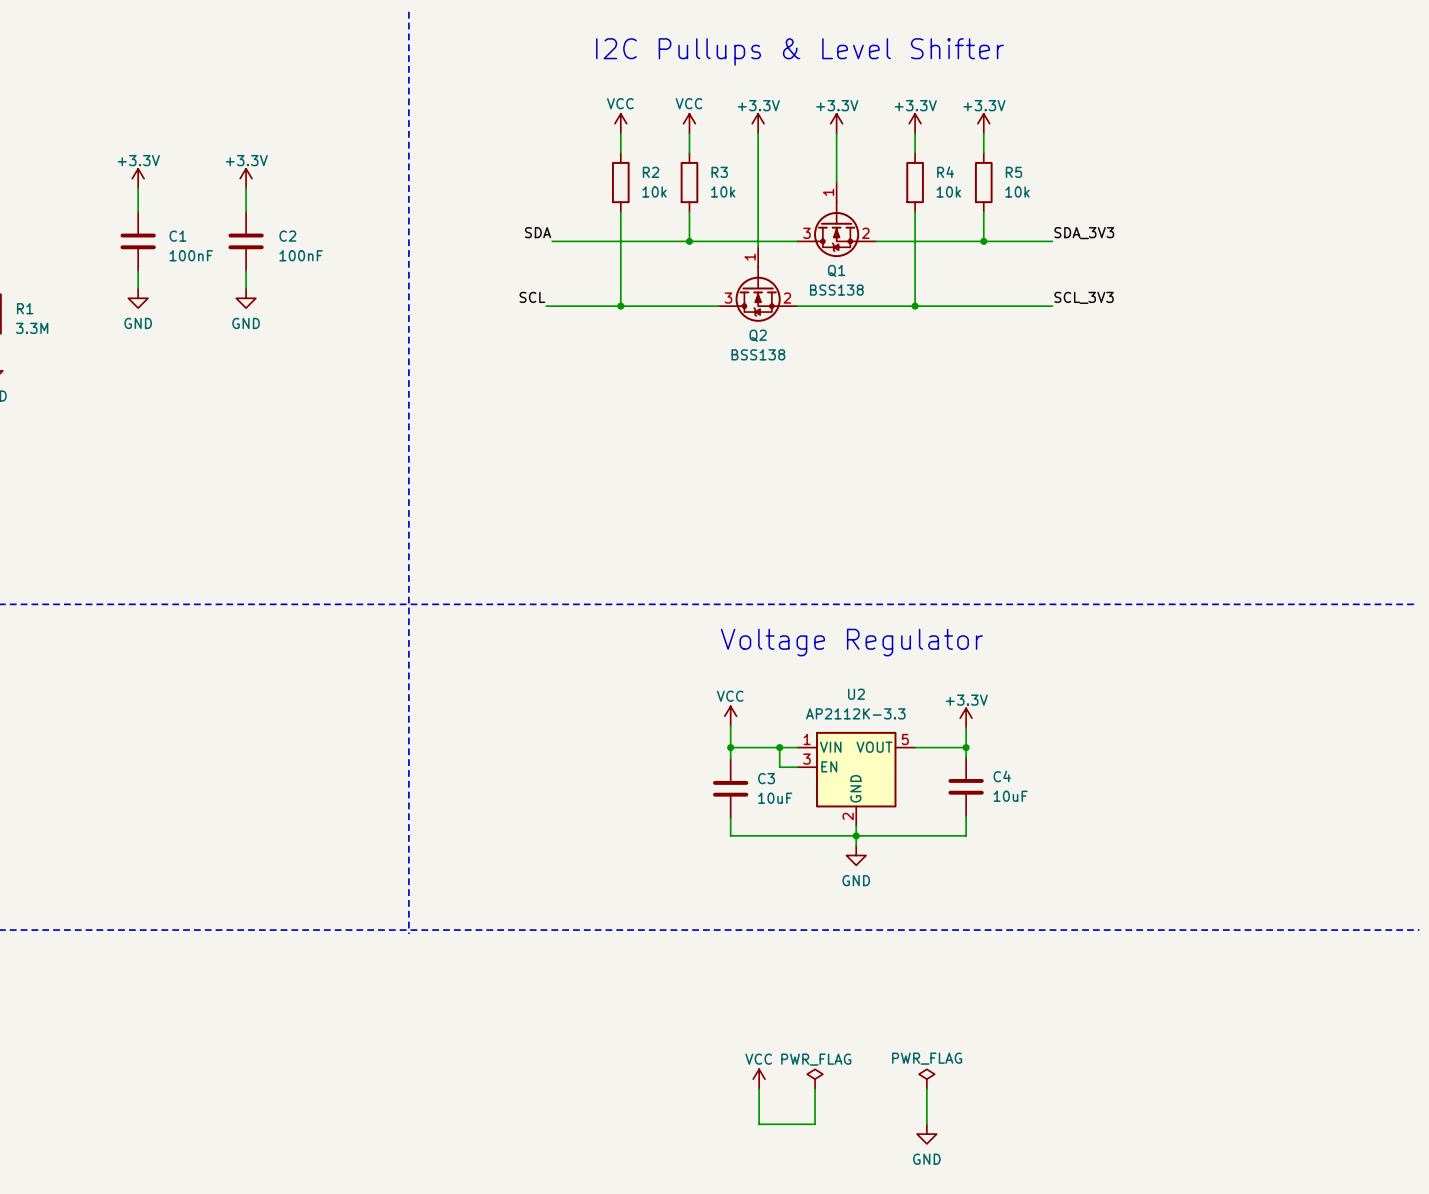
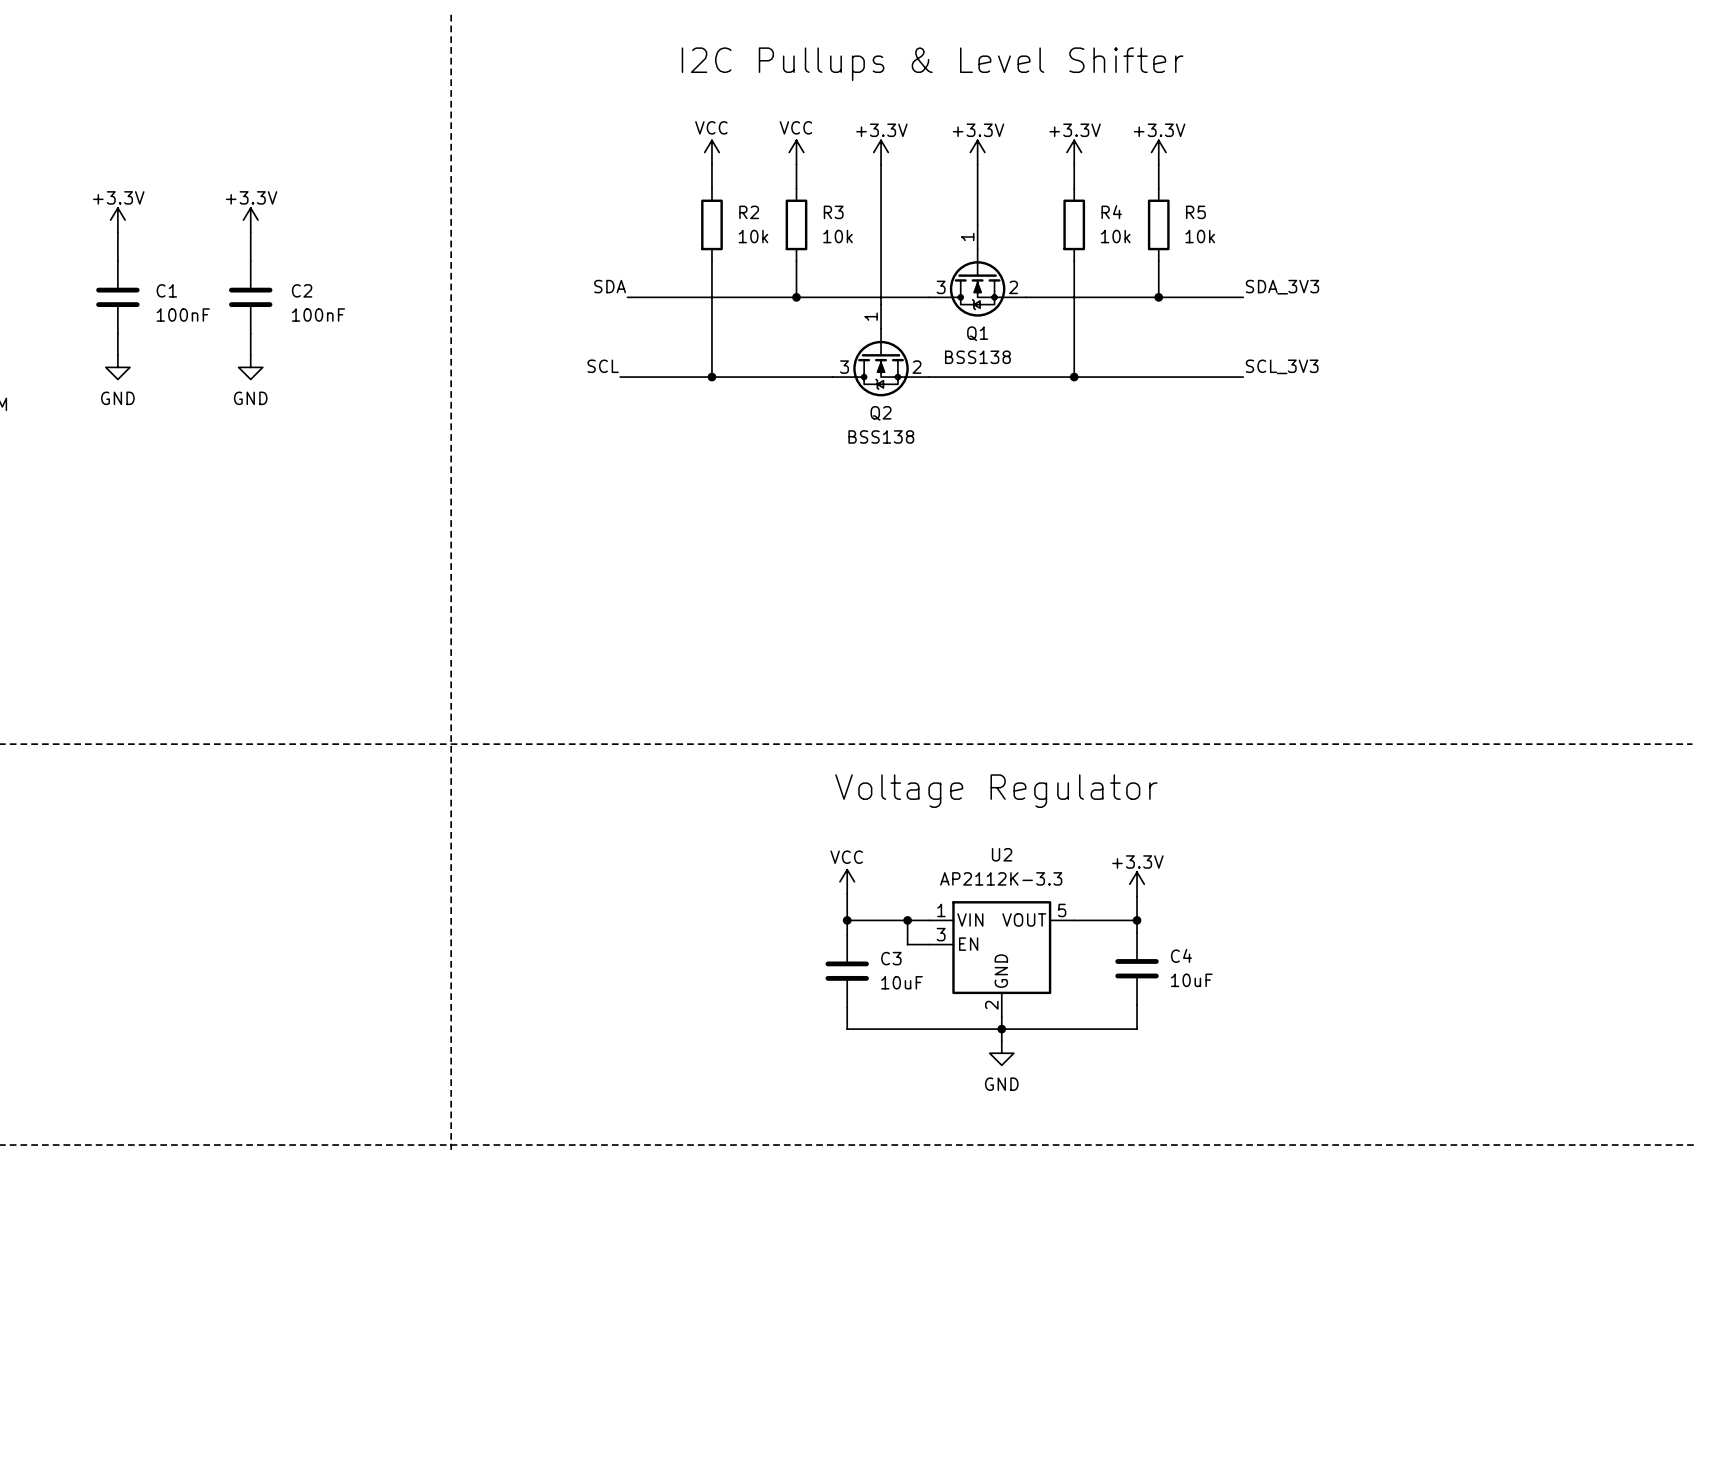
power symbol: VCC (759, 1079) -> none
power symbol: PWR_FLAG (815, 1079) -> none
power symbol: PWR_FLAG (926, 1079) -> none
wire: (759, 1088) (759, 1124) (815, 1124) (815, 1088) -> none
wire: (926, 1088) (926, 1124) -> none
power symbol: GND (926, 1134) -> none

